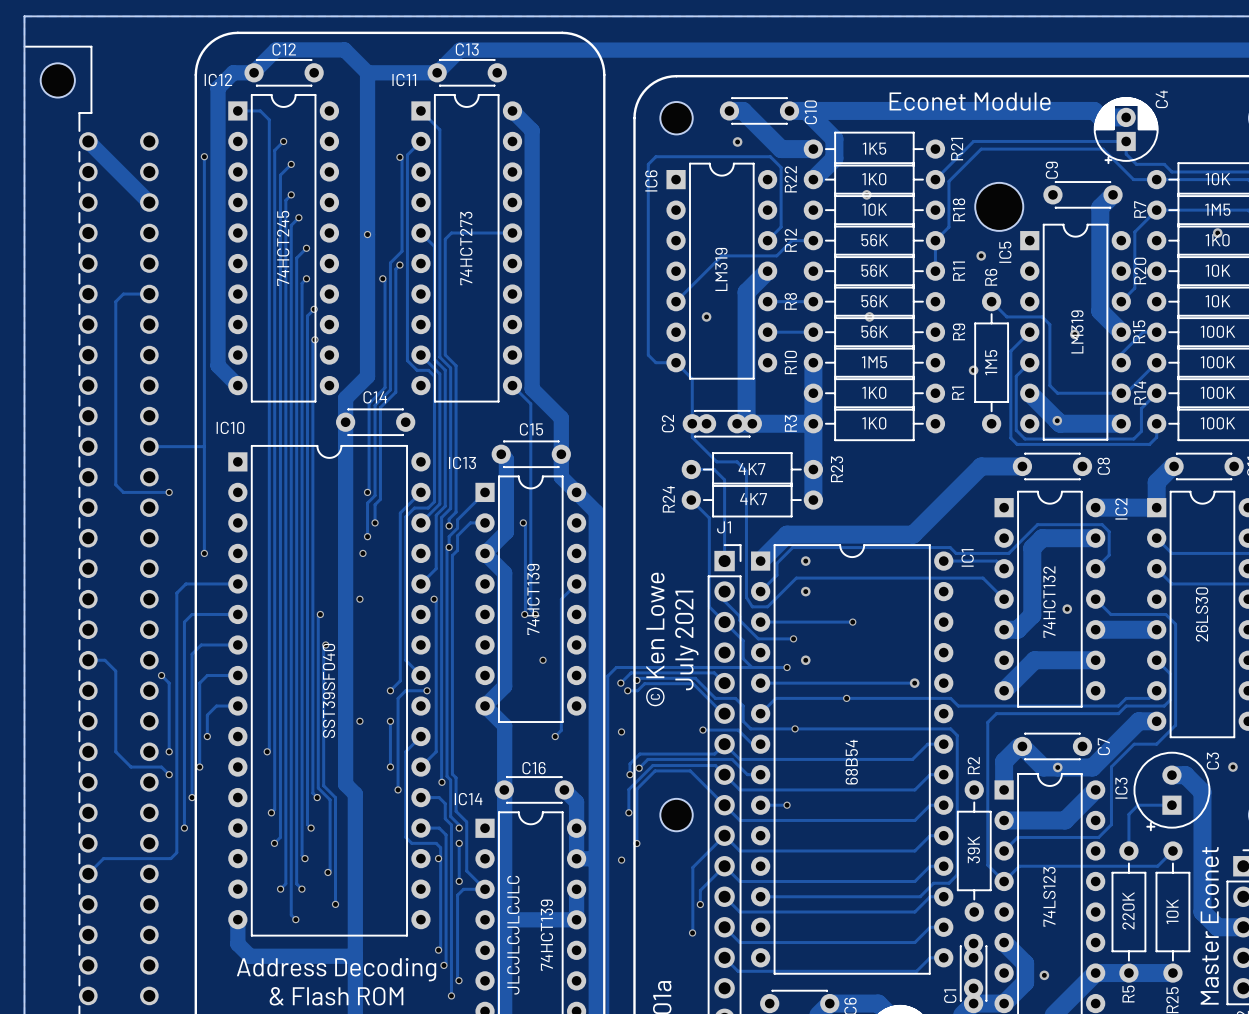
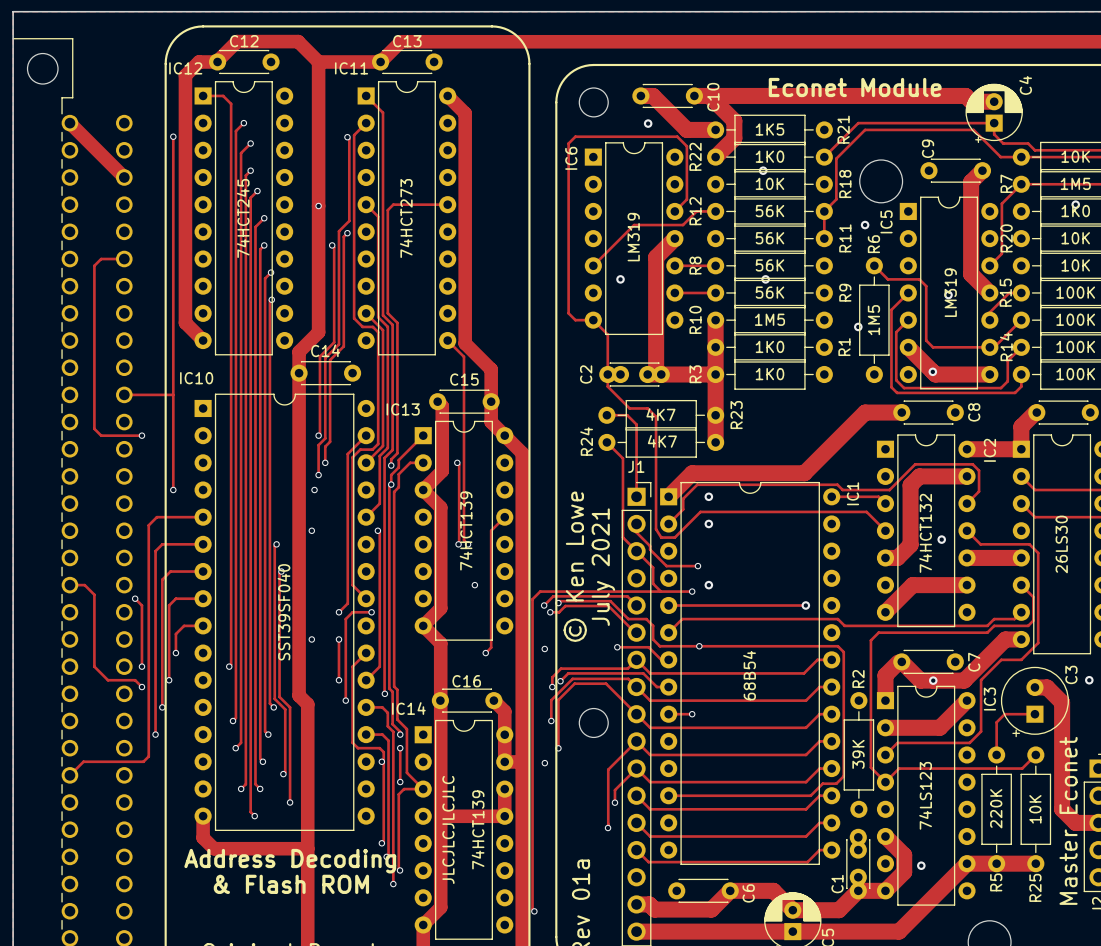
track: (760, 622) (852, 622) -> none
via: (852, 622) -> none
via: (846, 698) -> none

